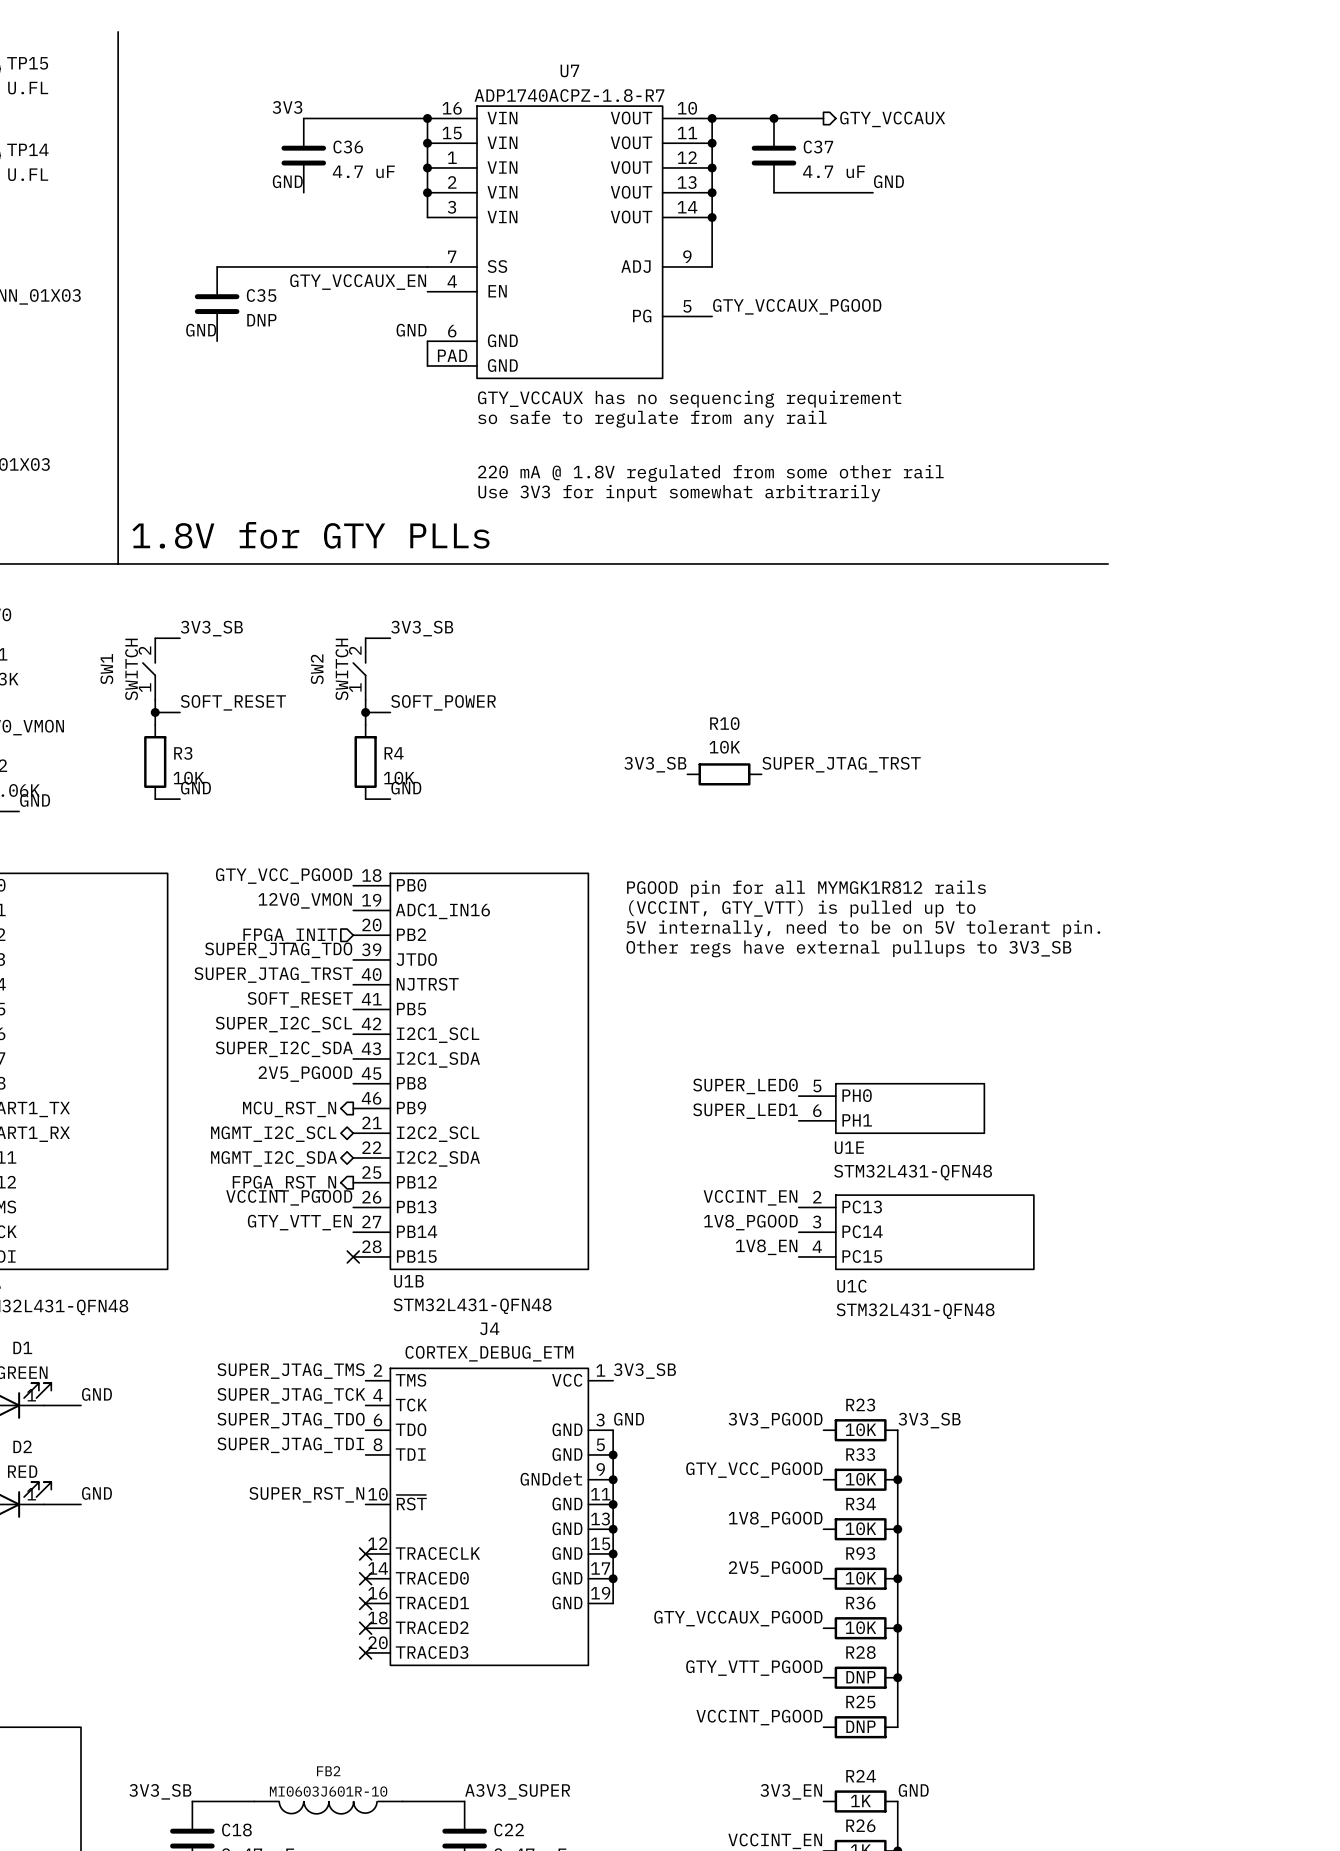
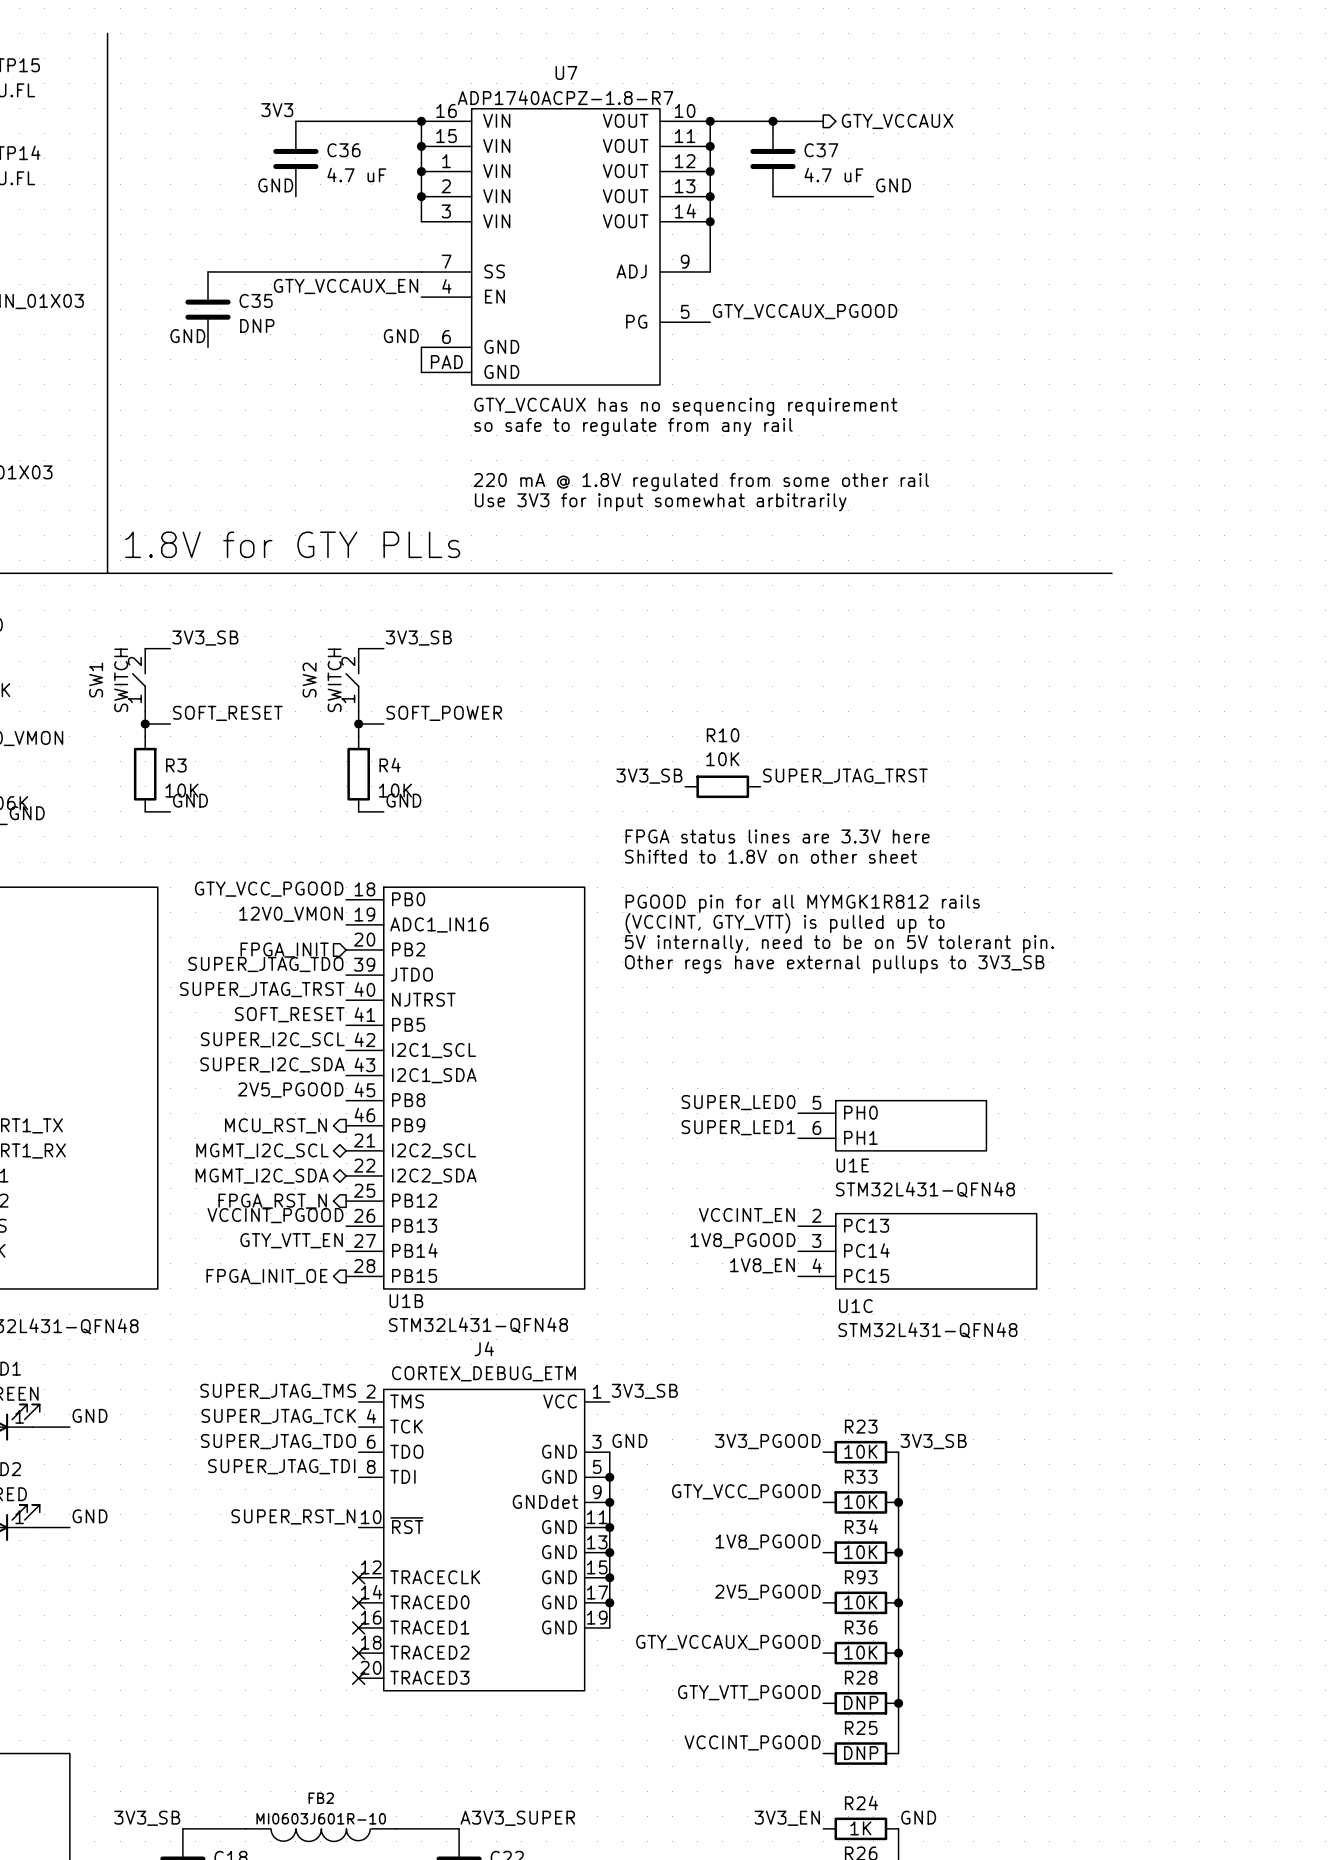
text: none -> FPGA status lines are 3.3V here (777, 836)
text: none -> Shifted to 1.8V on other sheet (770, 856)
no-connect mark: (353, 1256) -> none
hierarchical label: none -> FPGA_INIT_OE (266, 1276)

